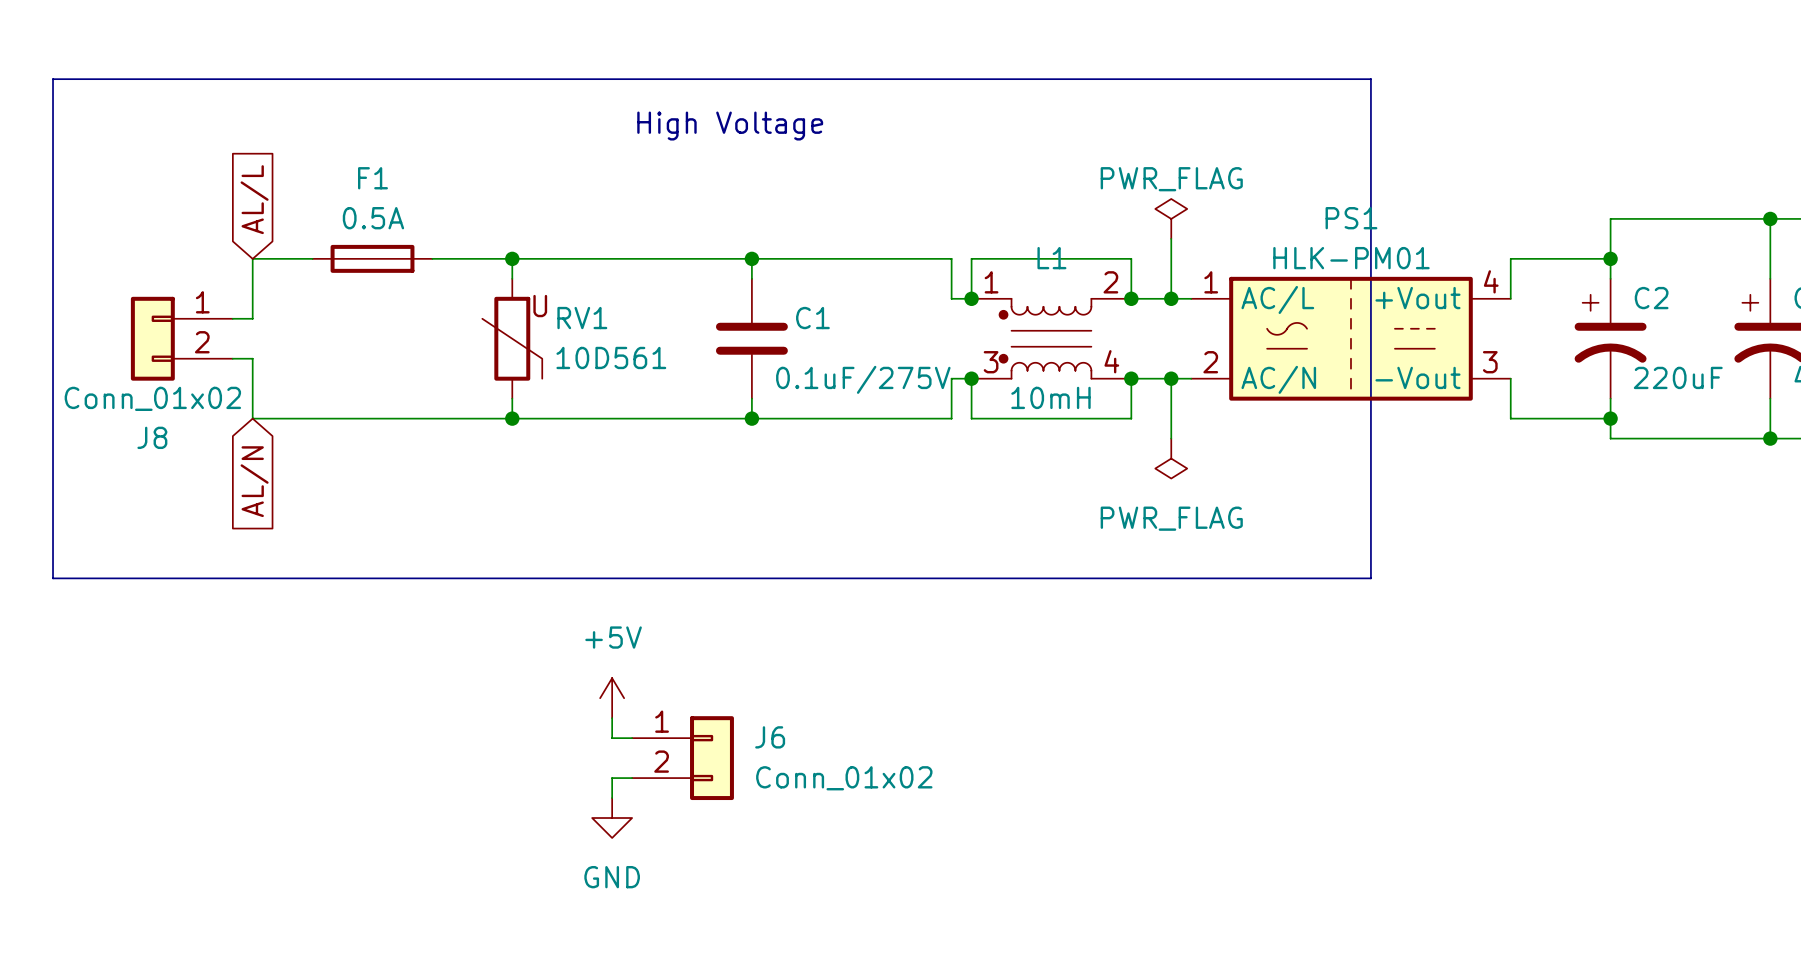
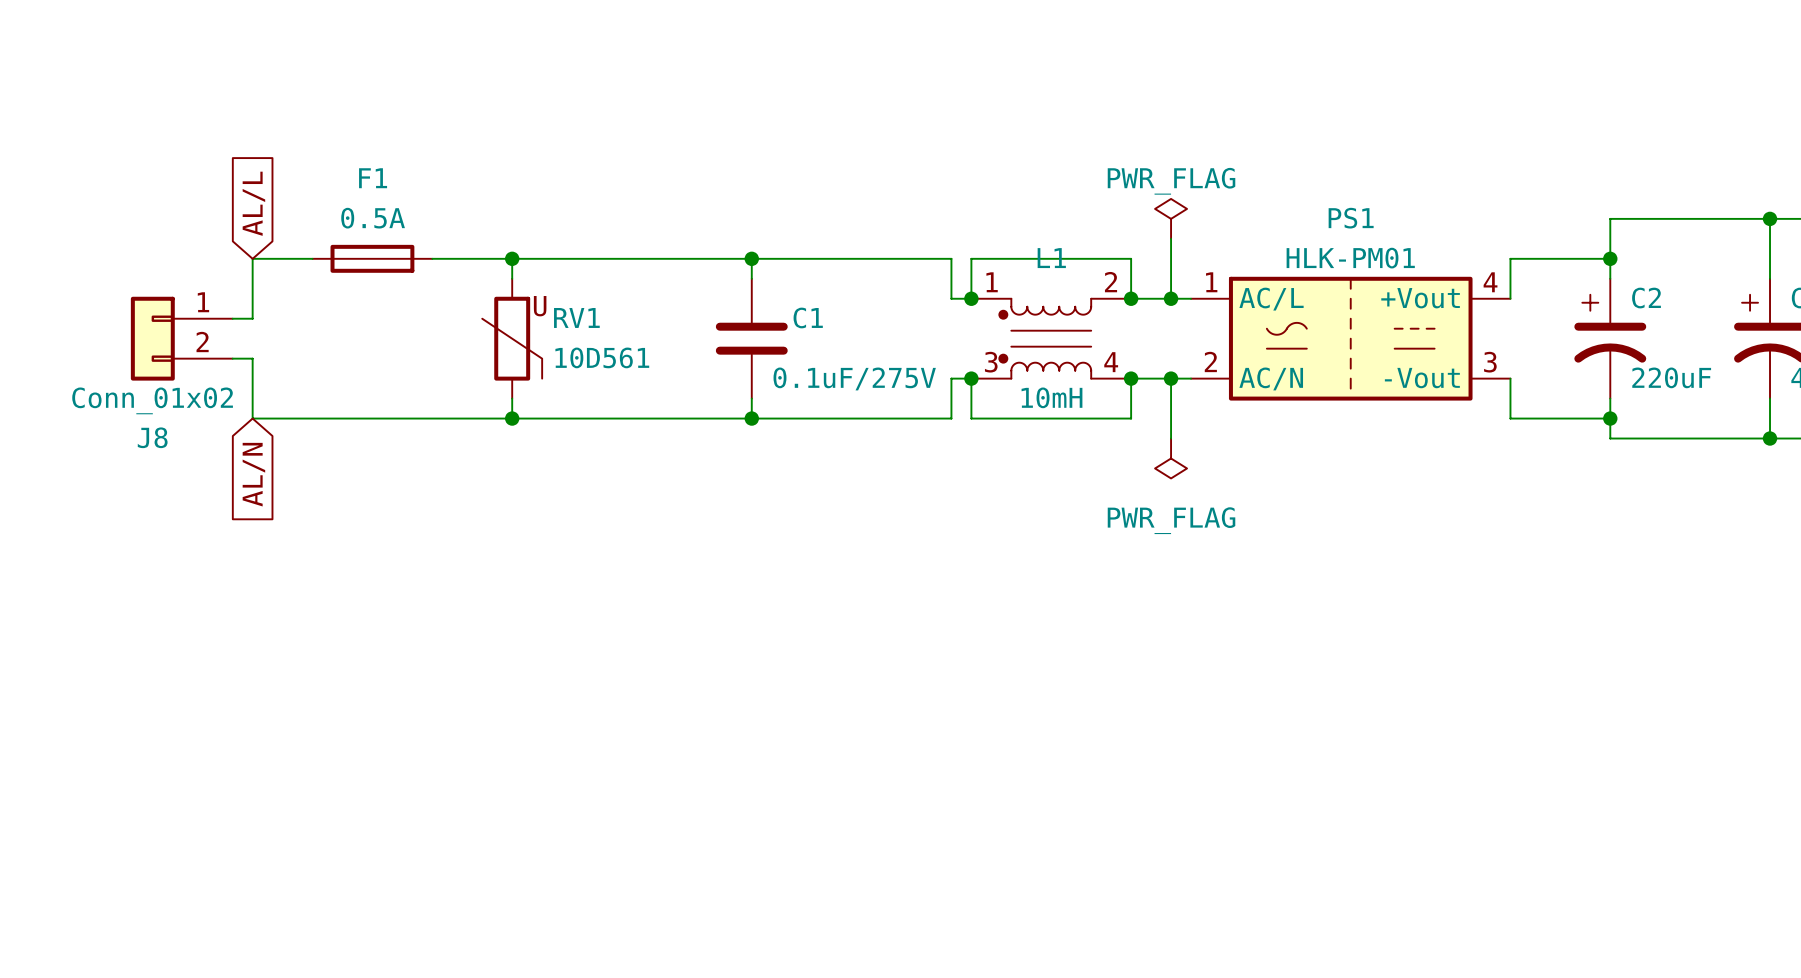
line: (53, 79) (1370, 79) (1370, 578) (53, 578) (53, 79) -> none
text: High Voltage (730, 126) -> none
power symbol: +5V (612, 698) -> none
wire: (612, 718) (612, 738) (632, 738) -> none
J6: Conn_01x02 (683, 758) -> none
wire: (632, 778) (612, 778) (612, 798) -> none
power symbol: GND (612, 818) -> none

